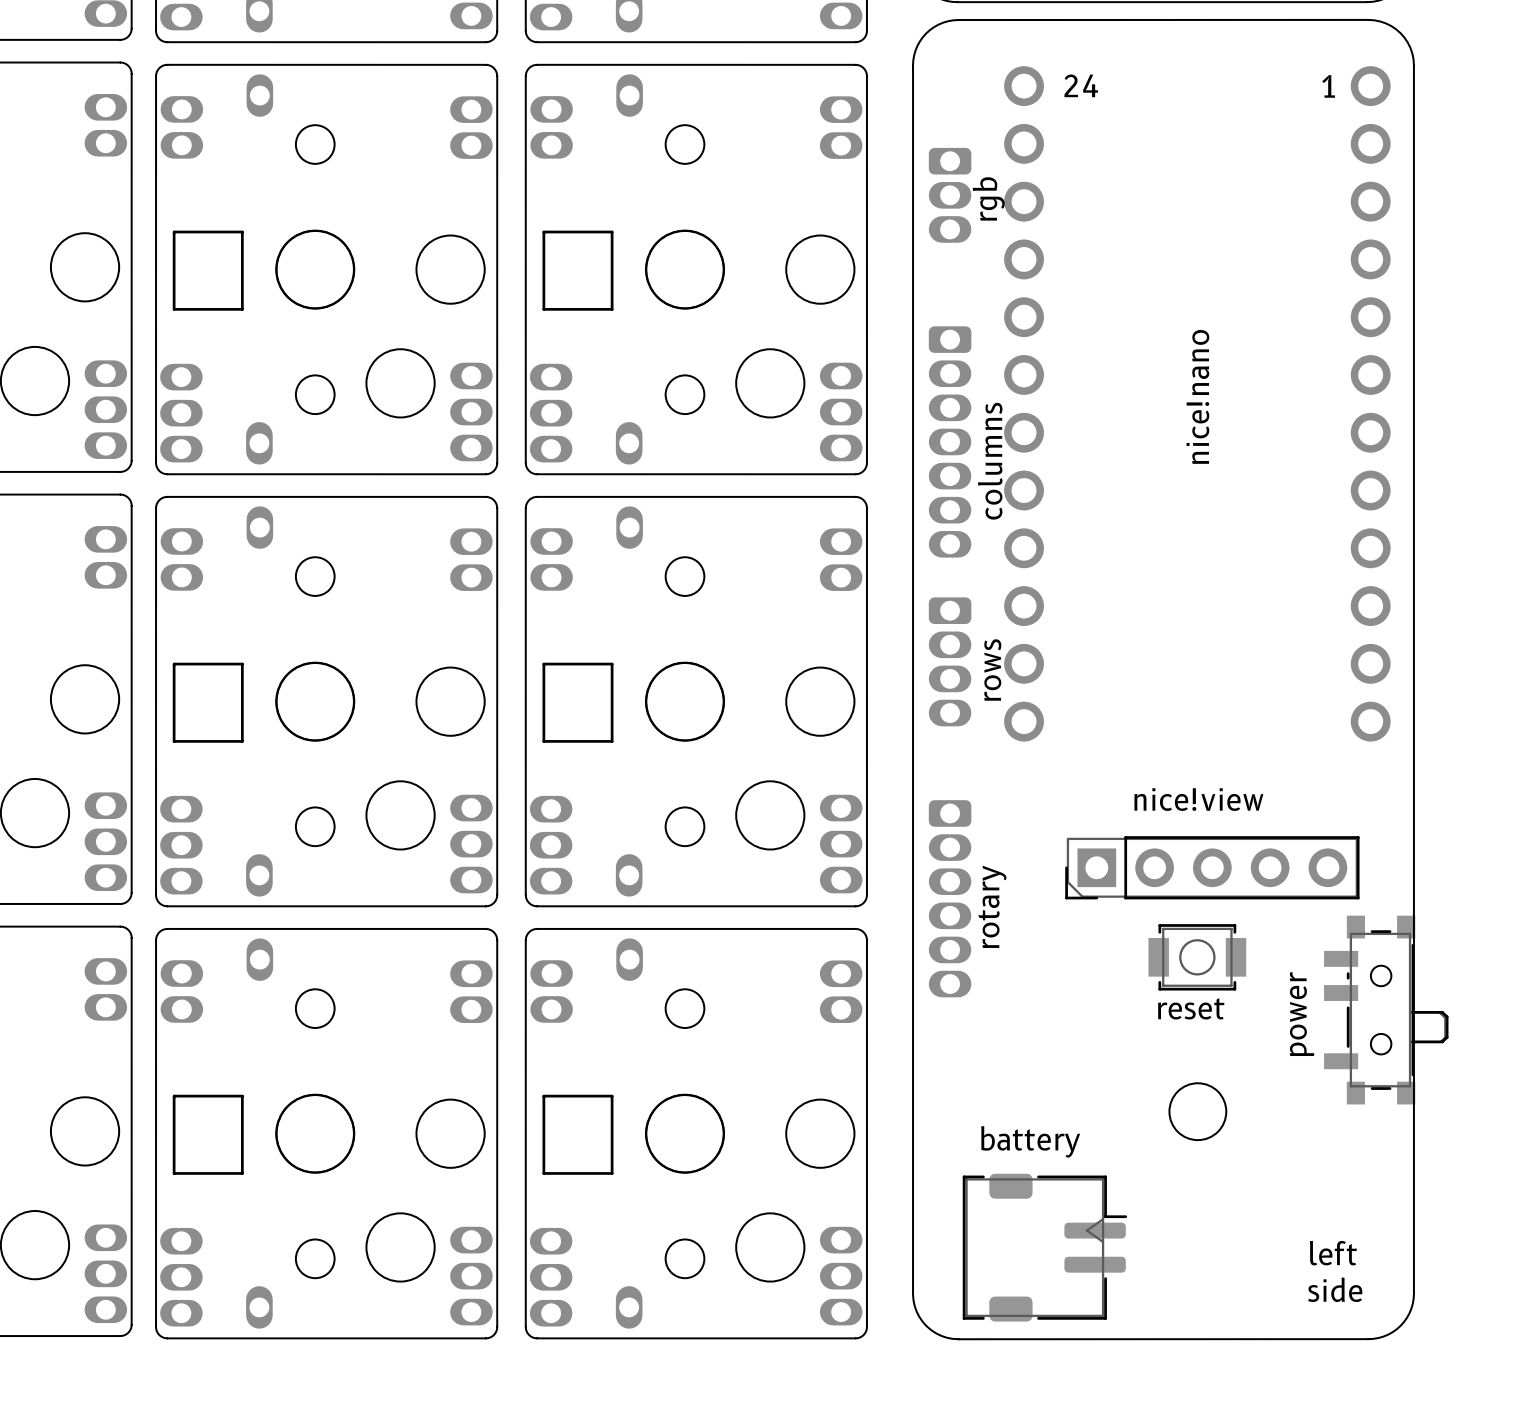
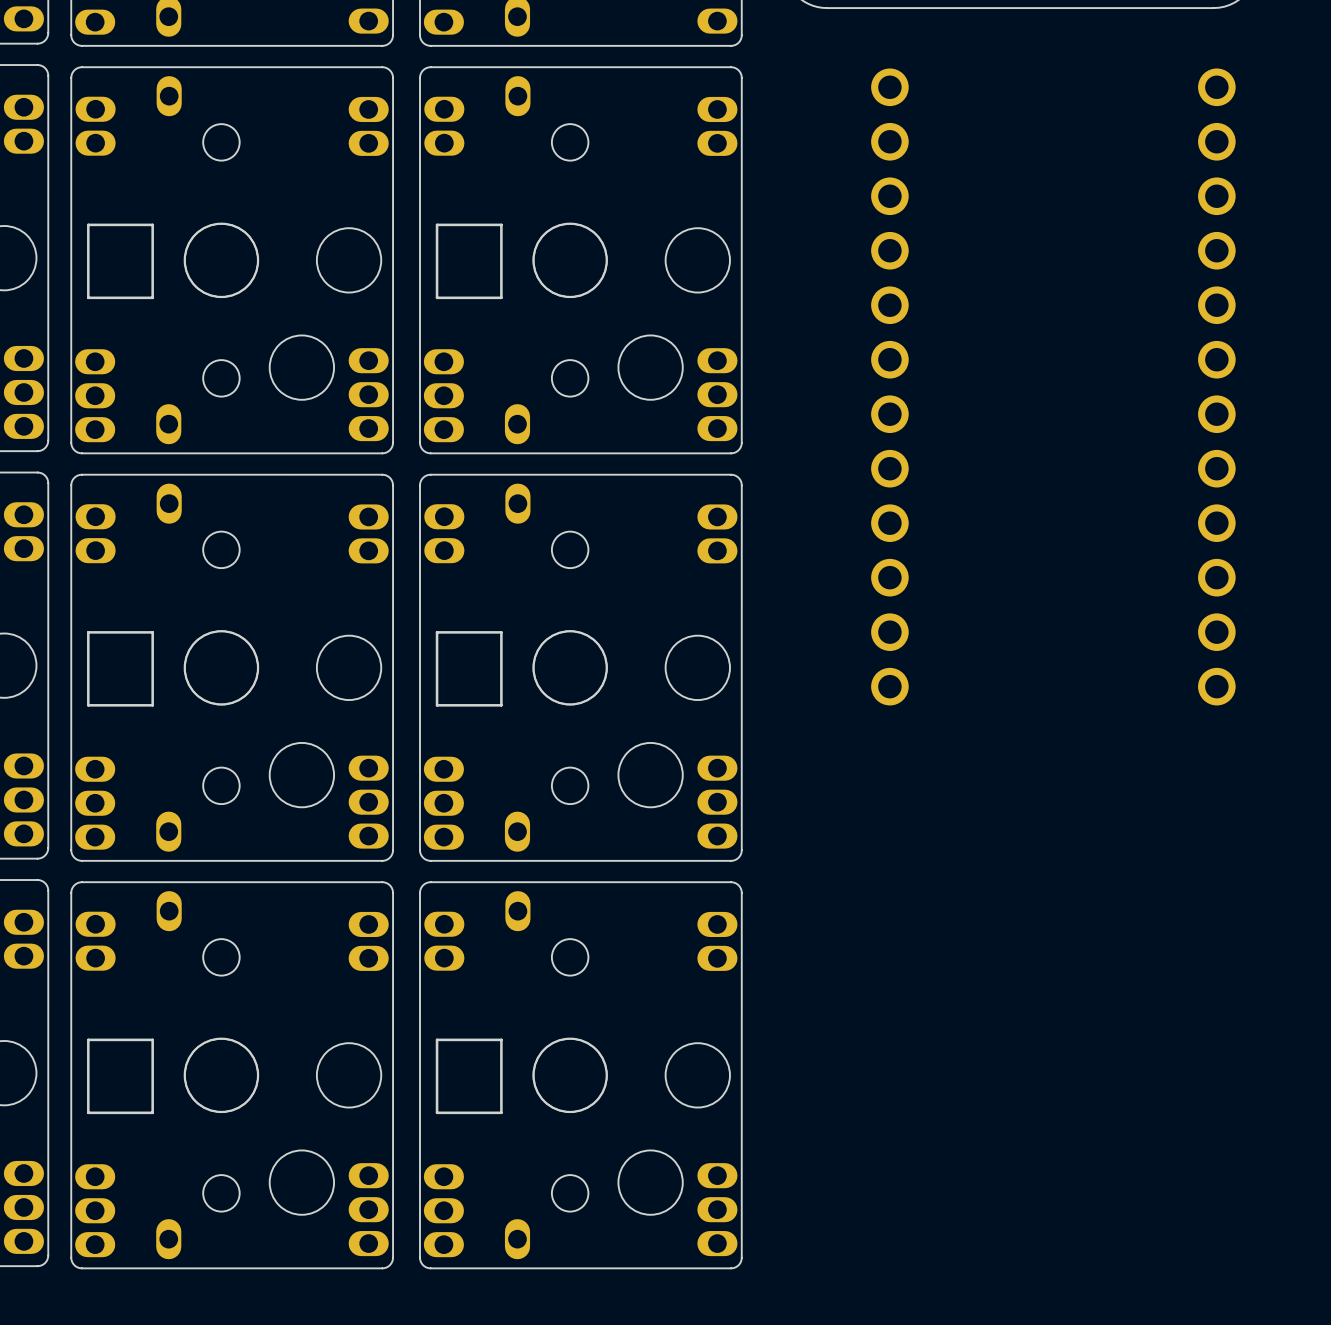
board edge: (958, 20) (1374, 20) (1391, 26) (1400, 33) (1407, 42) (1412, 53) (1413, 65) (1413, 1293) (1412, 1303) (1406, 1317) (1396, 1329) (1383, 1336) (1368, 1339) (952, 1338) (941, 1335) (930, 1329) (922, 1321) (914, 1305) (913, 1294) (913, 65) (917, 45) (926, 33) (943, 22) (958, 20) -> none
text: 24 (1081, 85) -> none
text: 1 (1328, 86) -> none
part: (950, 195) -> none
text: rgb (988, 198) -> none
text: nice!nano (1197, 396) -> none
part: (950, 441) -> none
text: columns (990, 461) -> none
part: (950, 661) -> none
text: rows (992, 669) -> none
text: nice!view (1198, 799) -> none
part: (1212, 867) -> none
part: (950, 898) -> none
text: rotary (992, 906) -> none
part: (1197, 957) -> none
text: reset (1191, 1008) -> none
part: (1386, 1010) -> none
text: power (1302, 1014) -> none
round board edge: [1169, 1083, 1227, 1141] -> none
text: battery (1030, 1141) -> none
part: (1044, 1247) -> none
text: left (1333, 1253) -> none
text: side (1335, 1289) -> none

